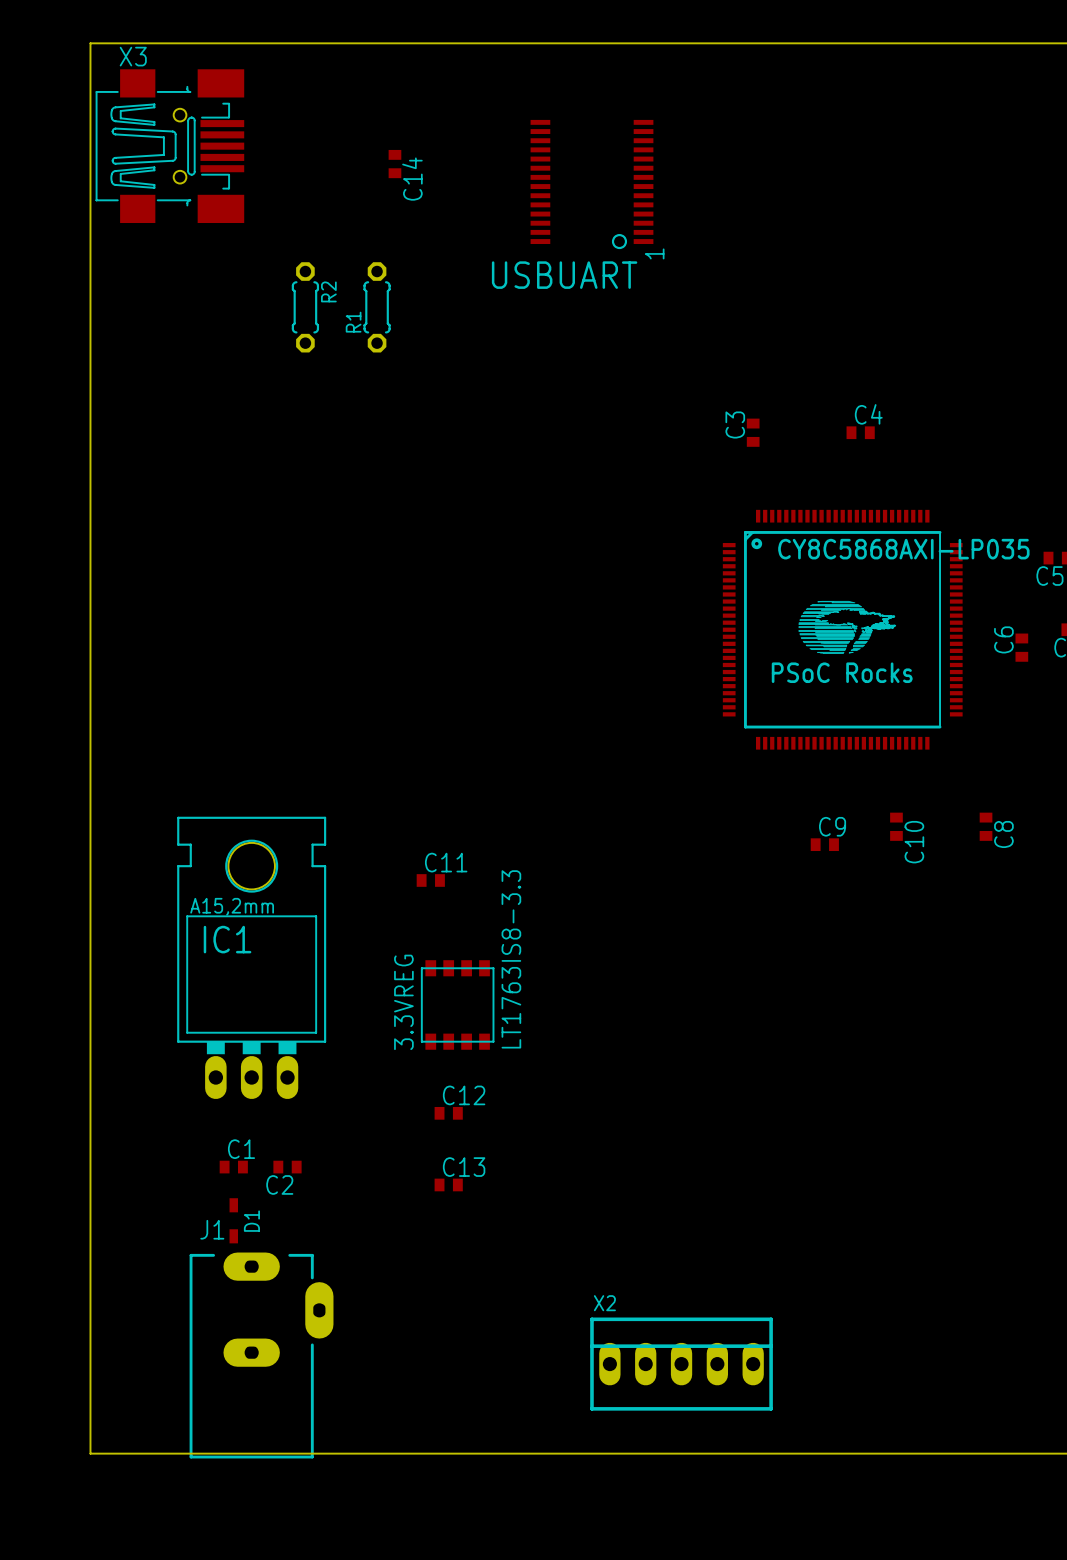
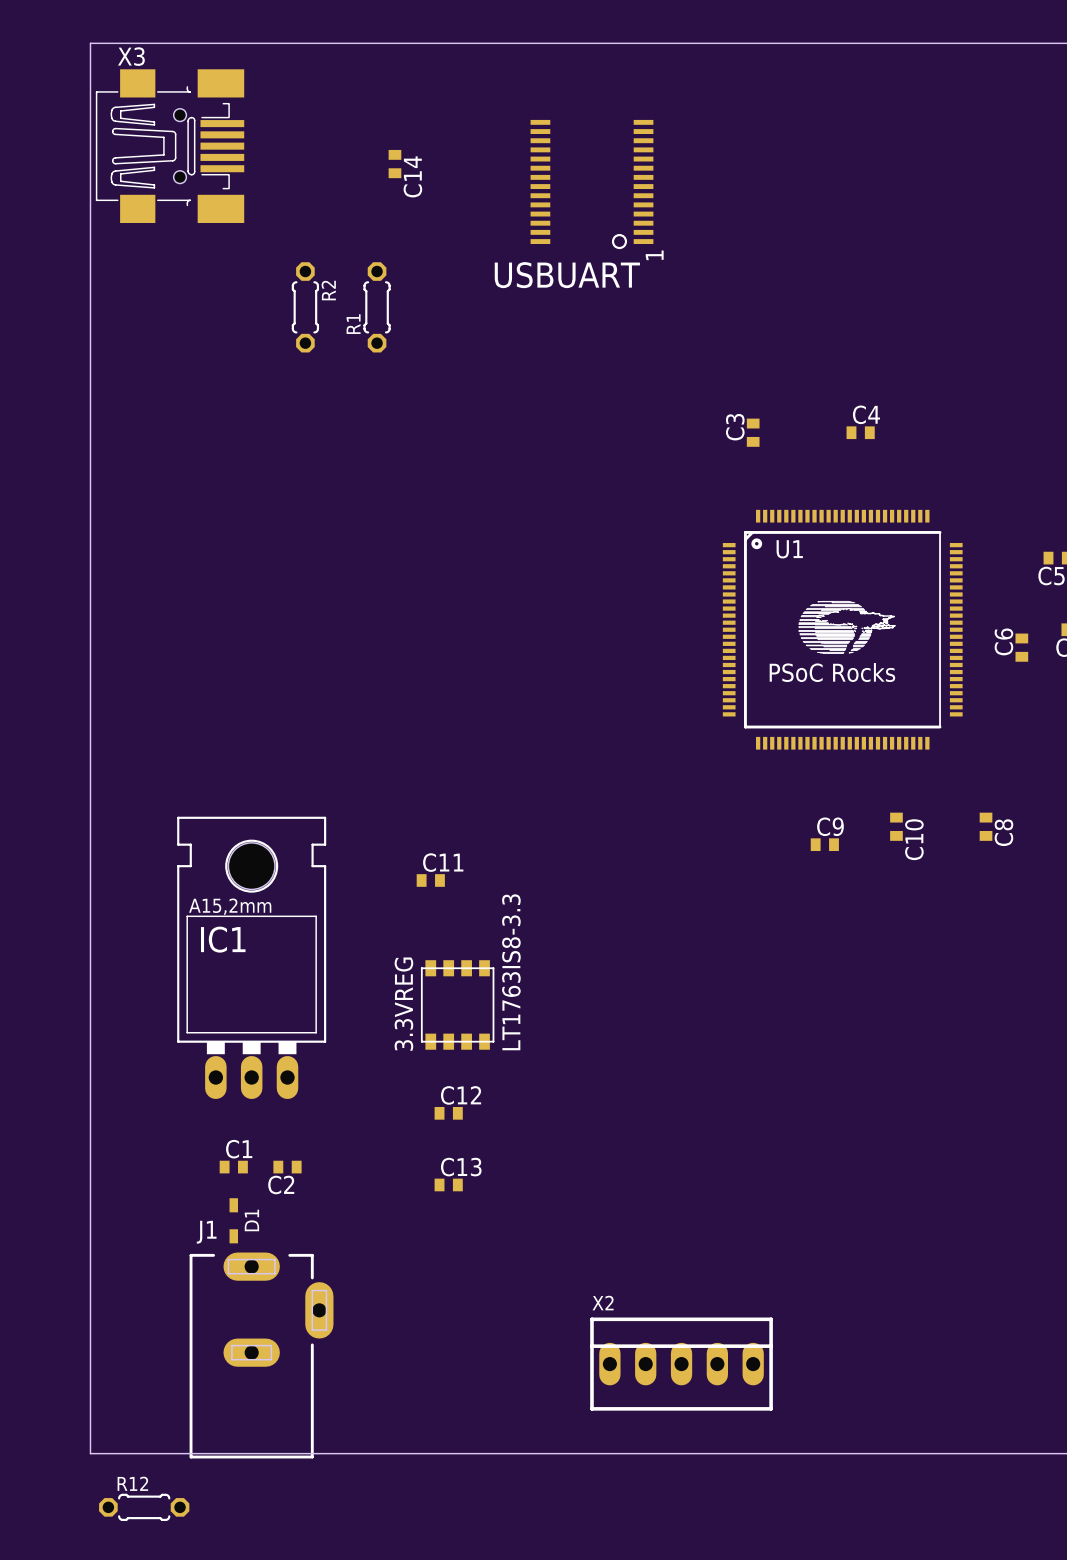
CY8C5868AXI-LP035 name: CY8C5868AXI-LP035 (903, 549) -> U1 (789, 549)
R12: none -> (144, 1507)

